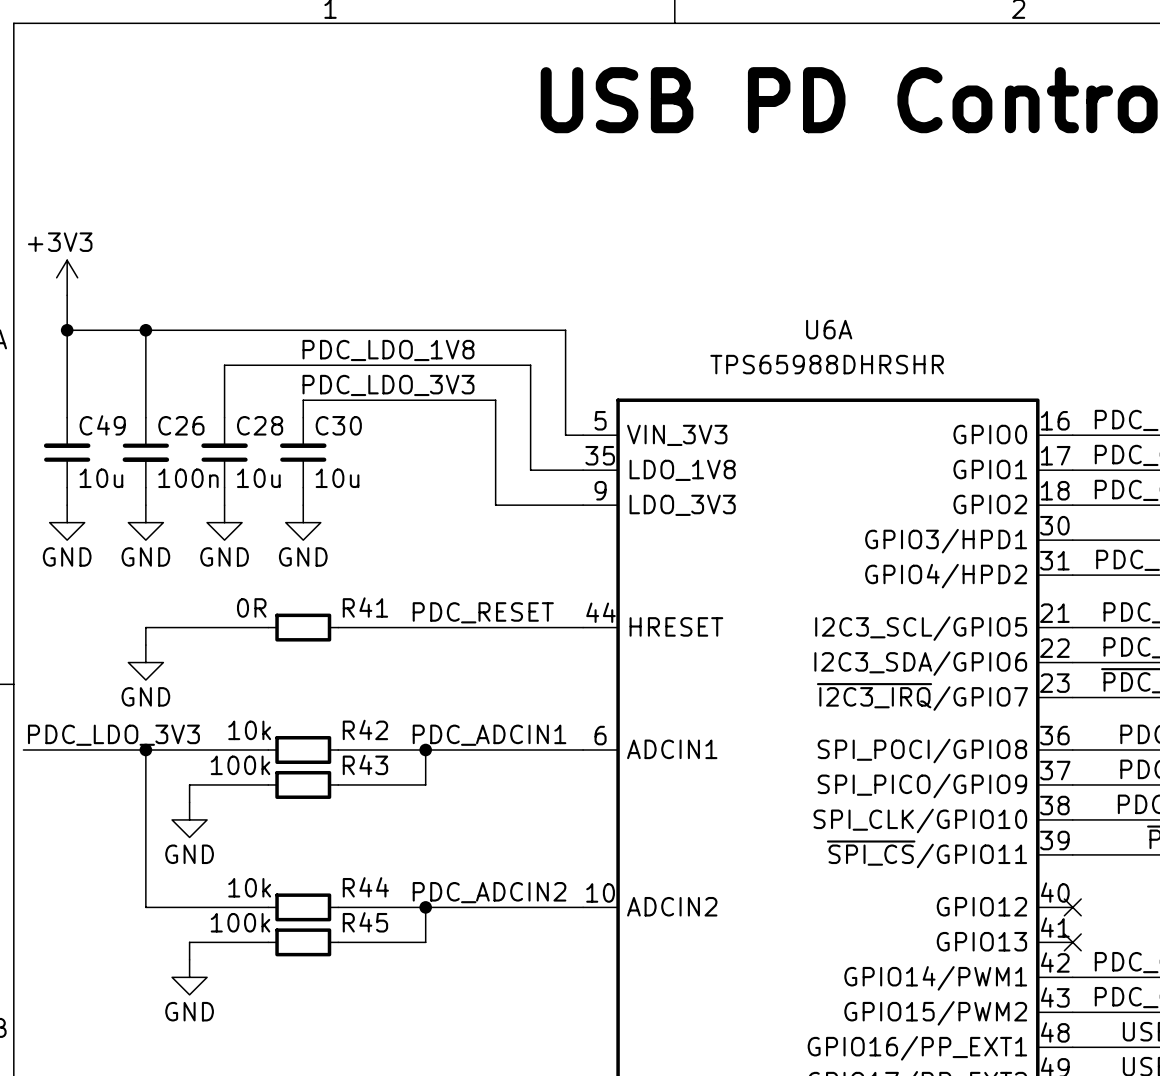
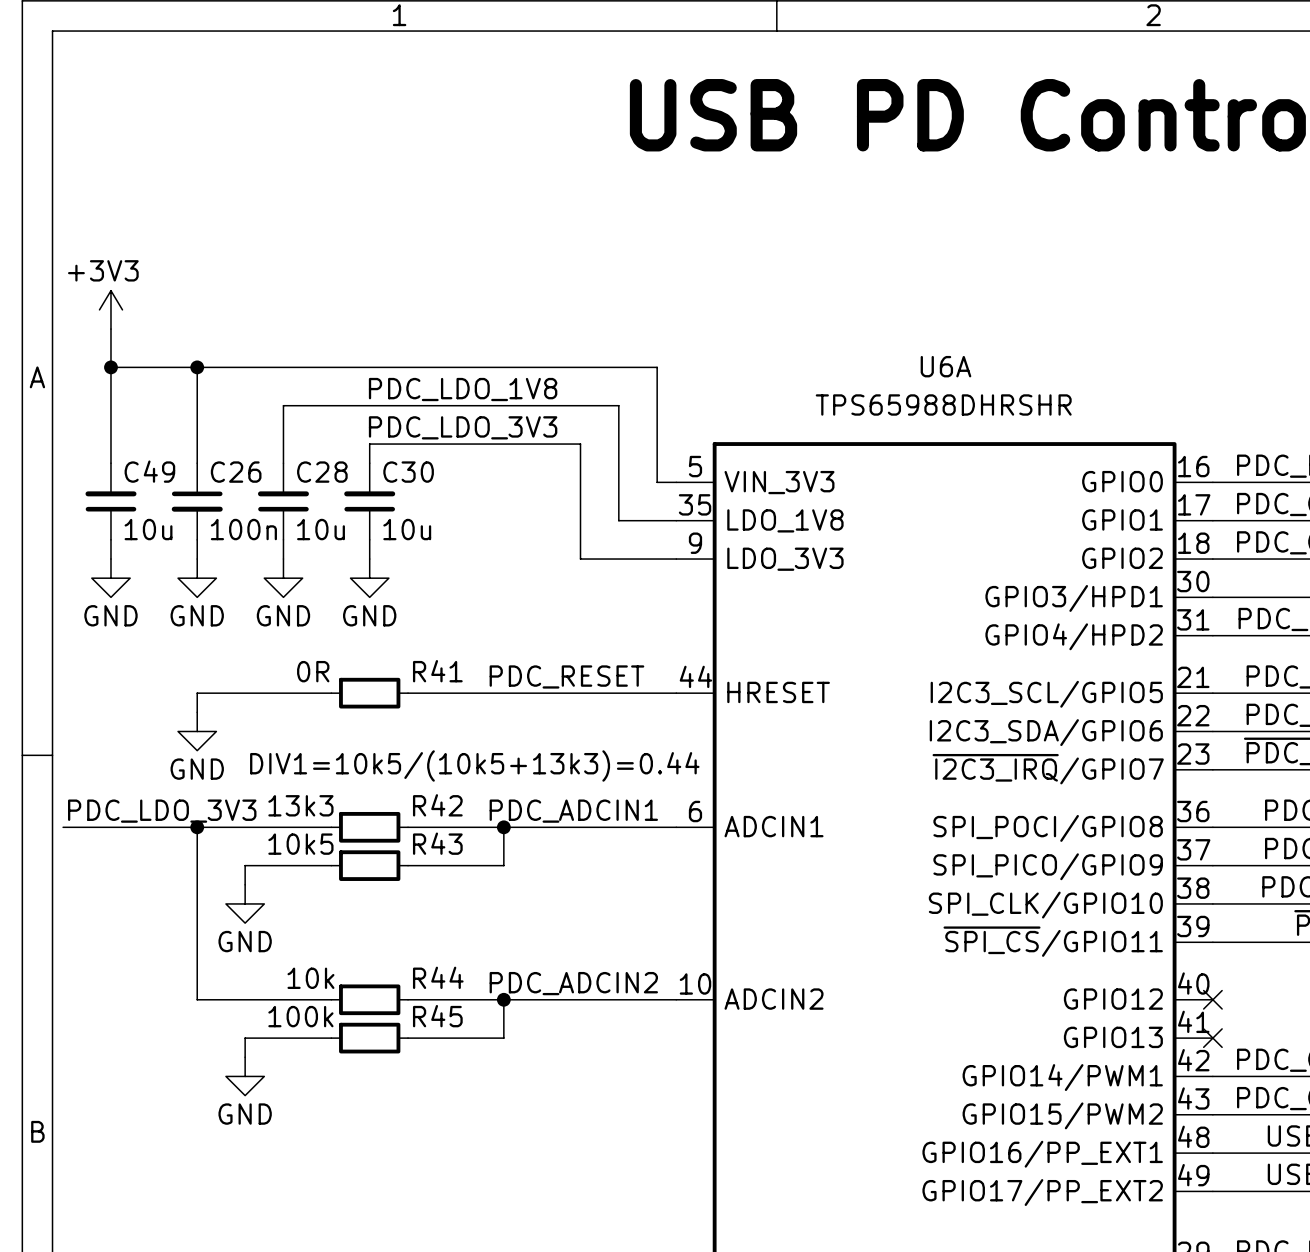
text: none -> DIV1=10k5/(10k5+13k3)=0.44 (474, 765)
R42 text: 10k (249, 730) -> 13k3 (300, 805)
R43 text: 100k (240, 765) -> 10k5 (300, 844)

